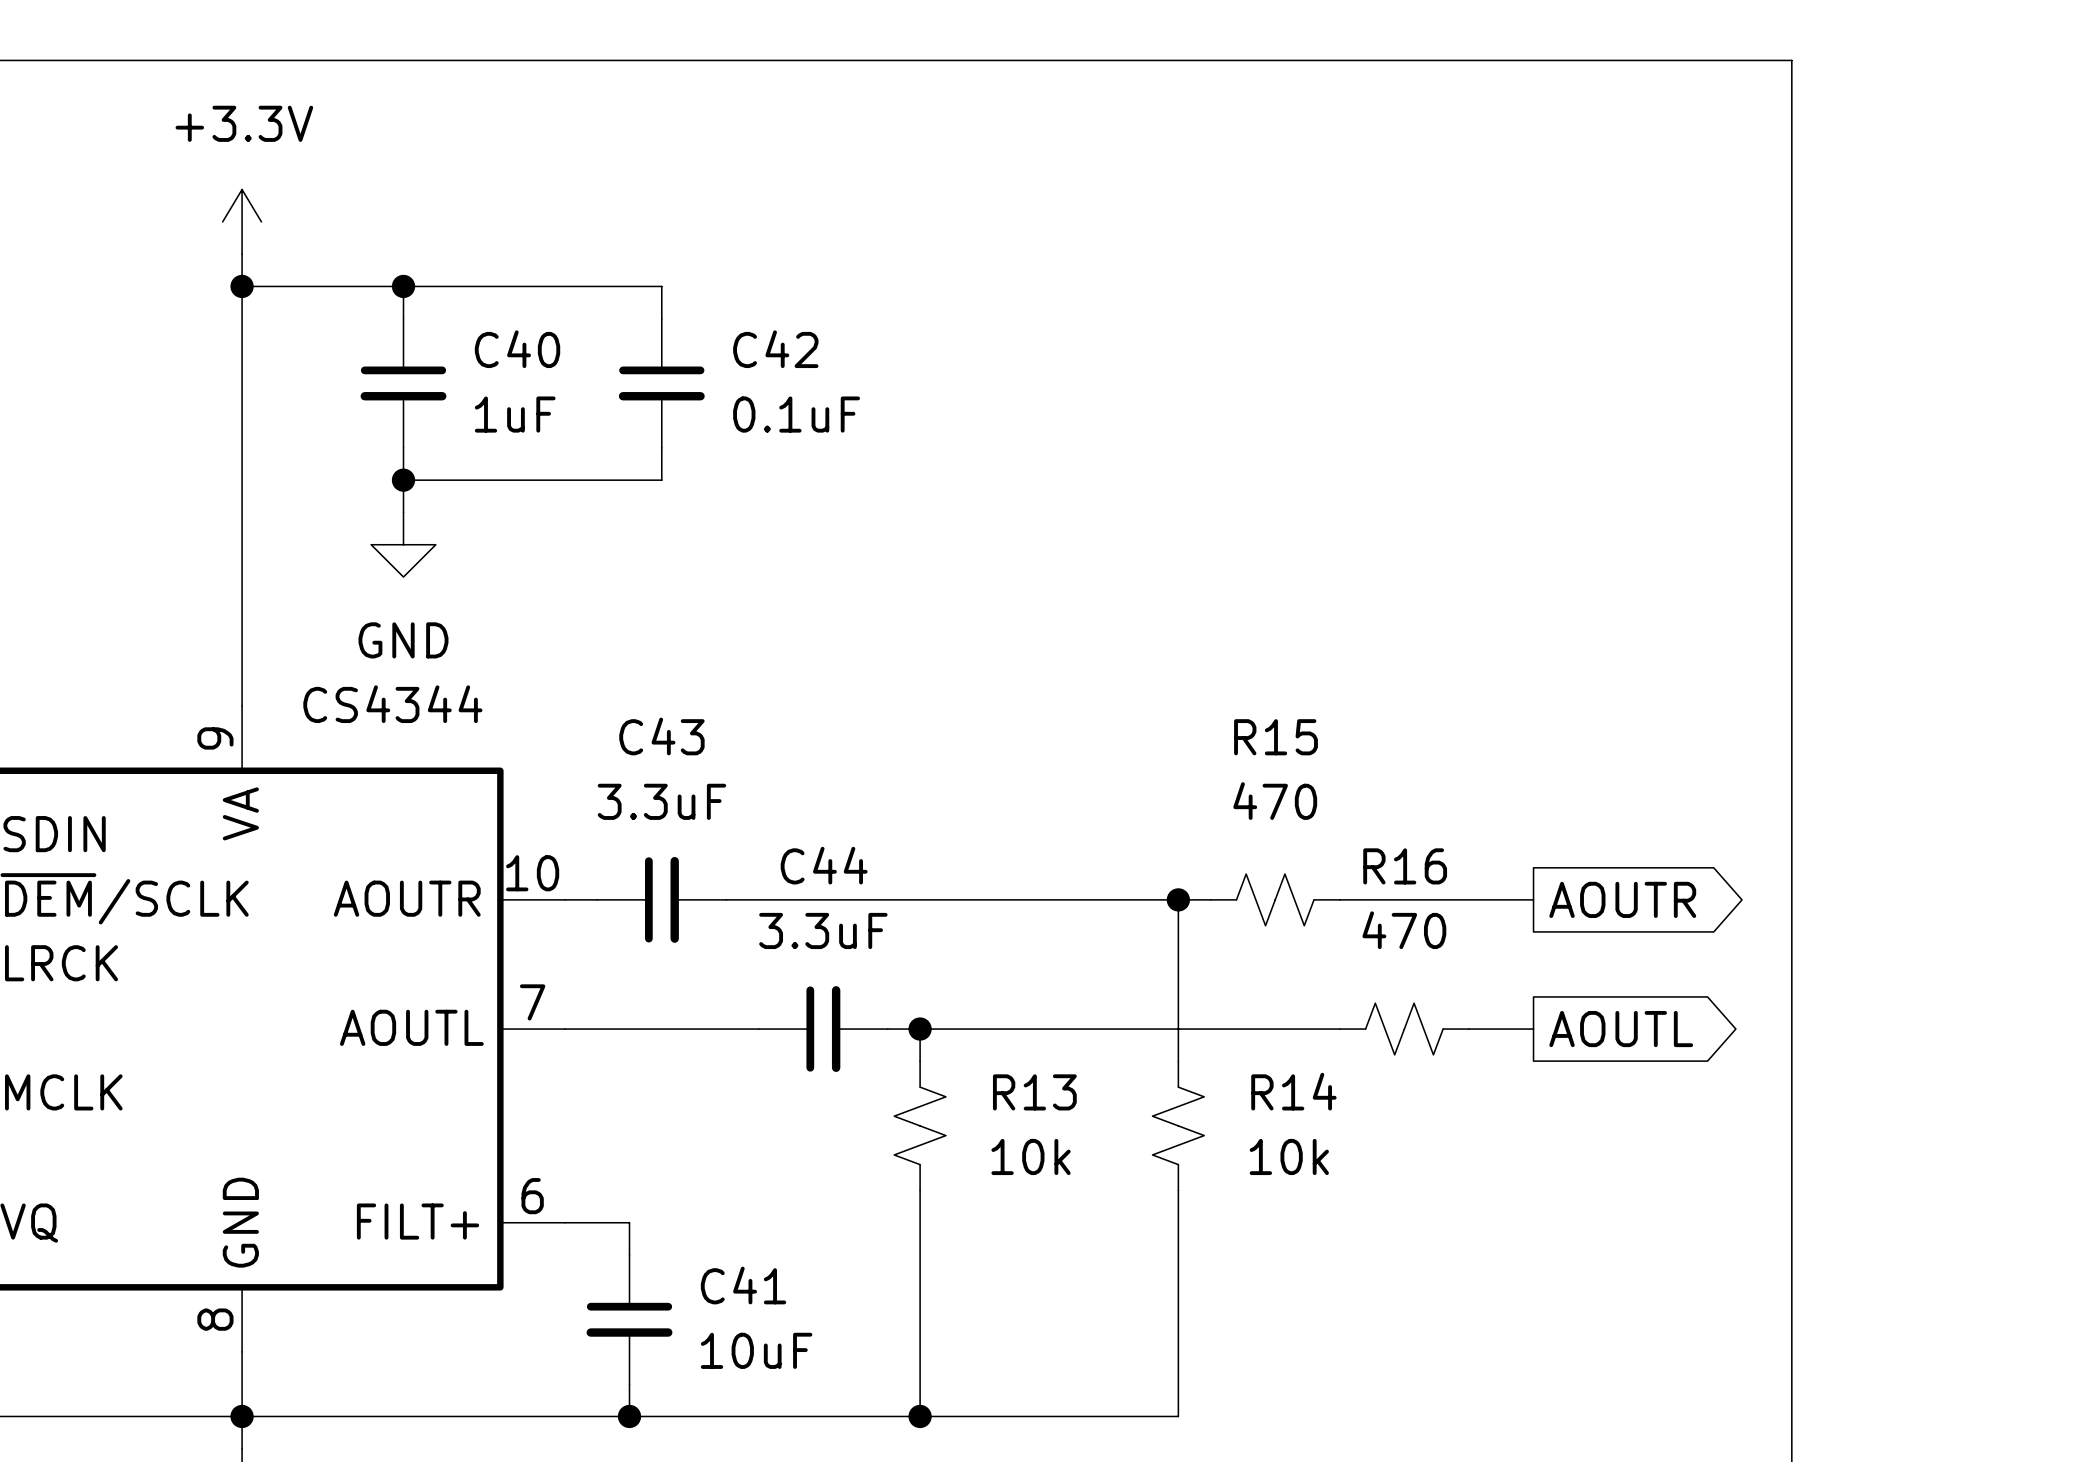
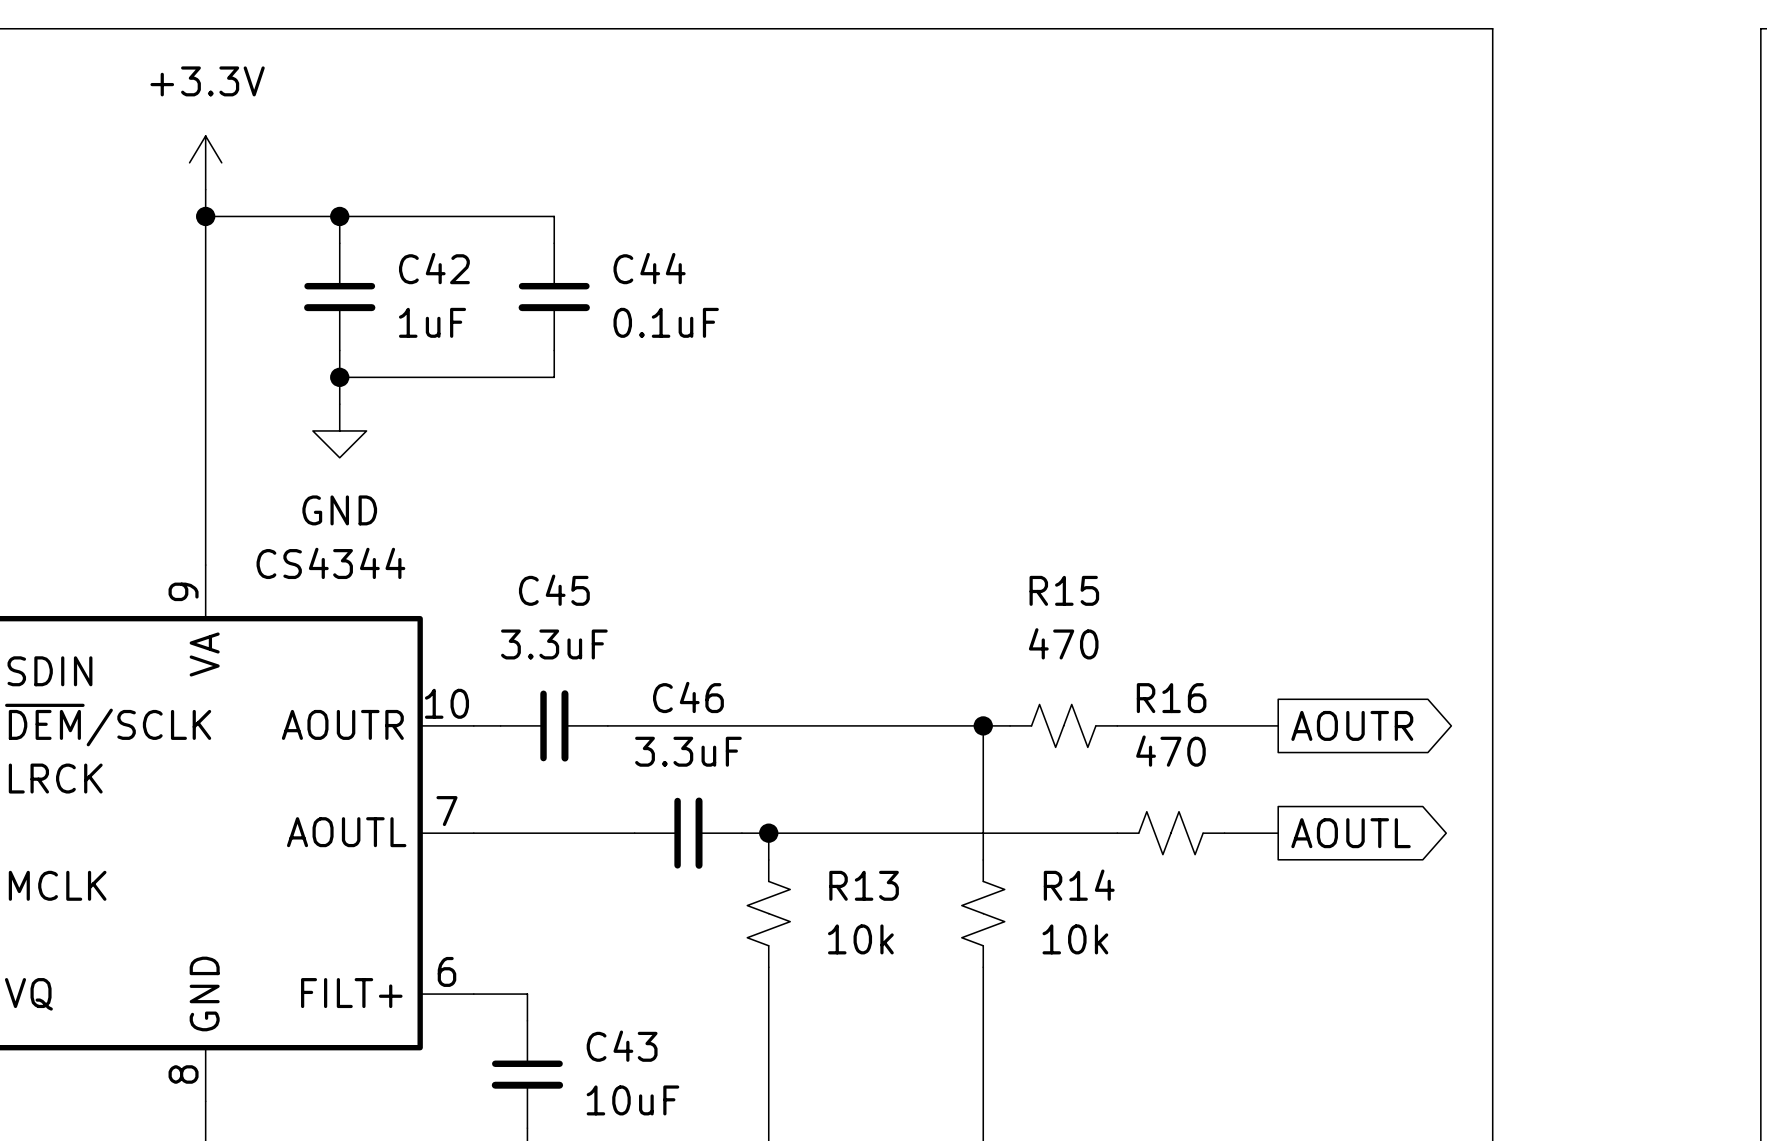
C40 name: C40 (517, 349) -> C42 (434, 268)
C42 name: C42 (775, 349) -> C44 (649, 268)
C43 name: C43 (661, 736) -> C45 (554, 590)
C44 name: C44 (824, 865) -> C46 (688, 697)
C41 name: C41 (743, 1285) -> C43 (622, 1046)

